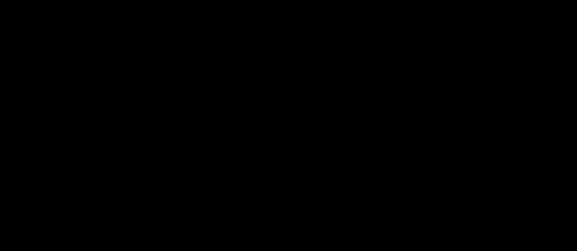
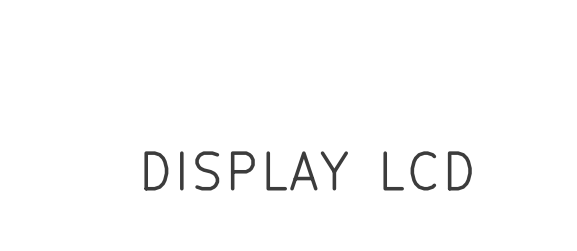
text: none -> DISPLAY LCD (308, 170)

